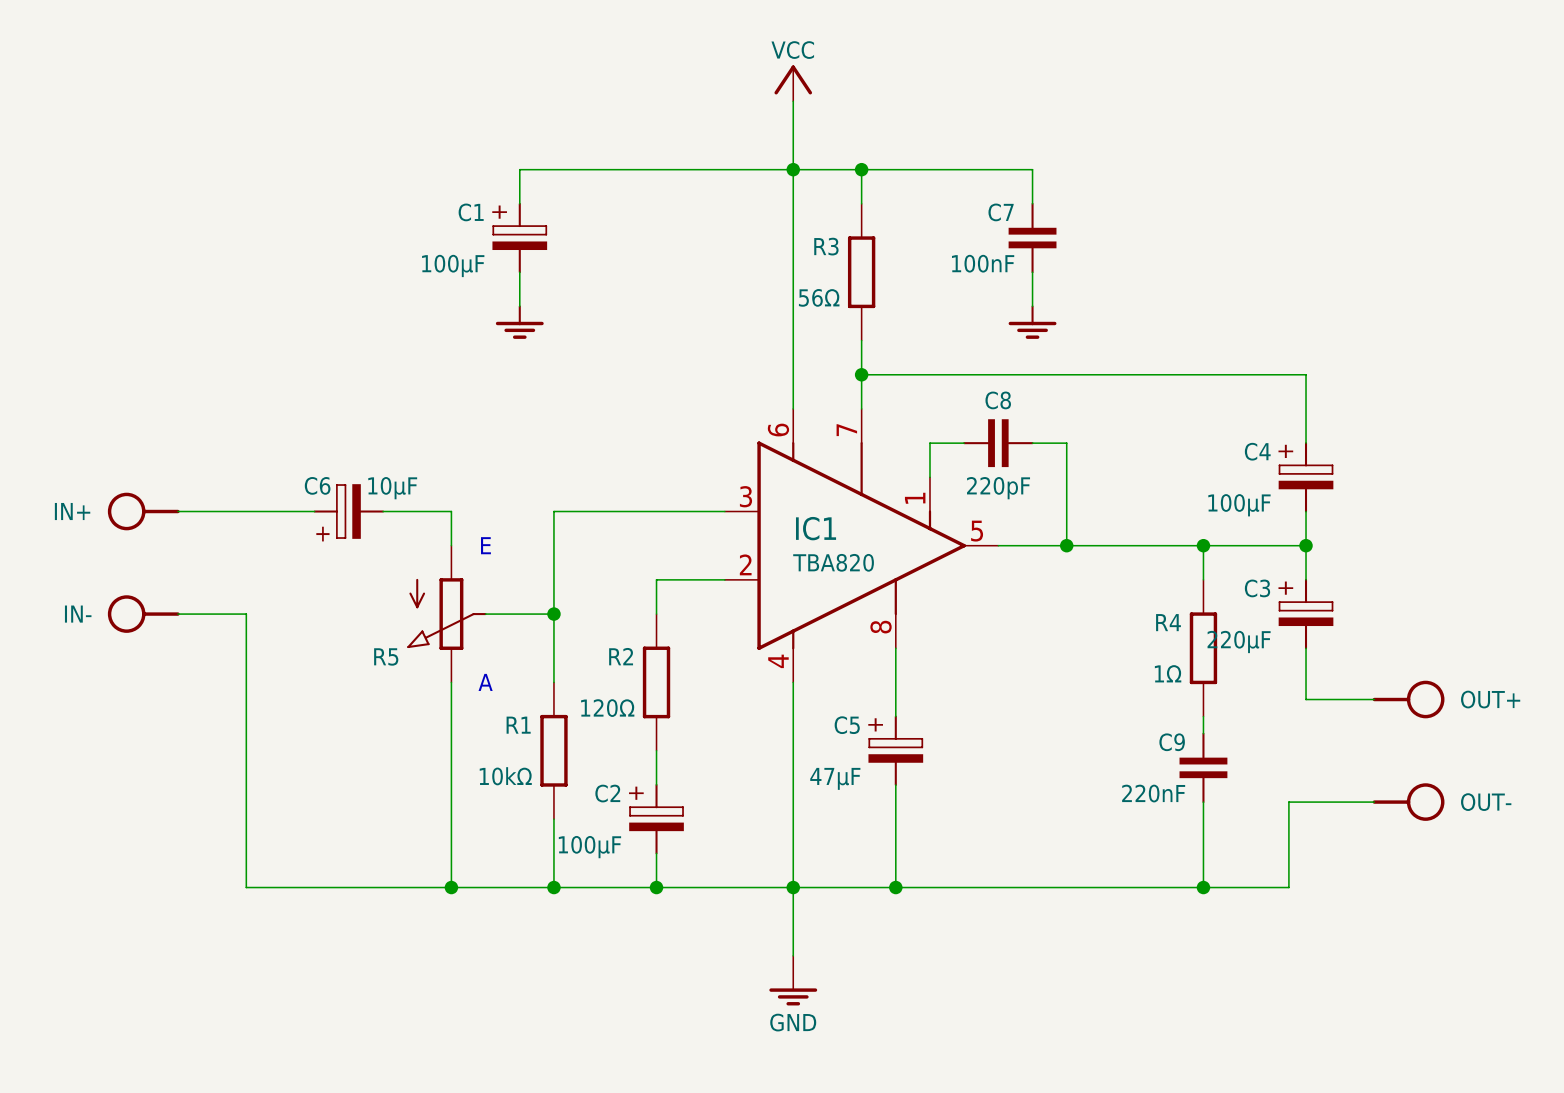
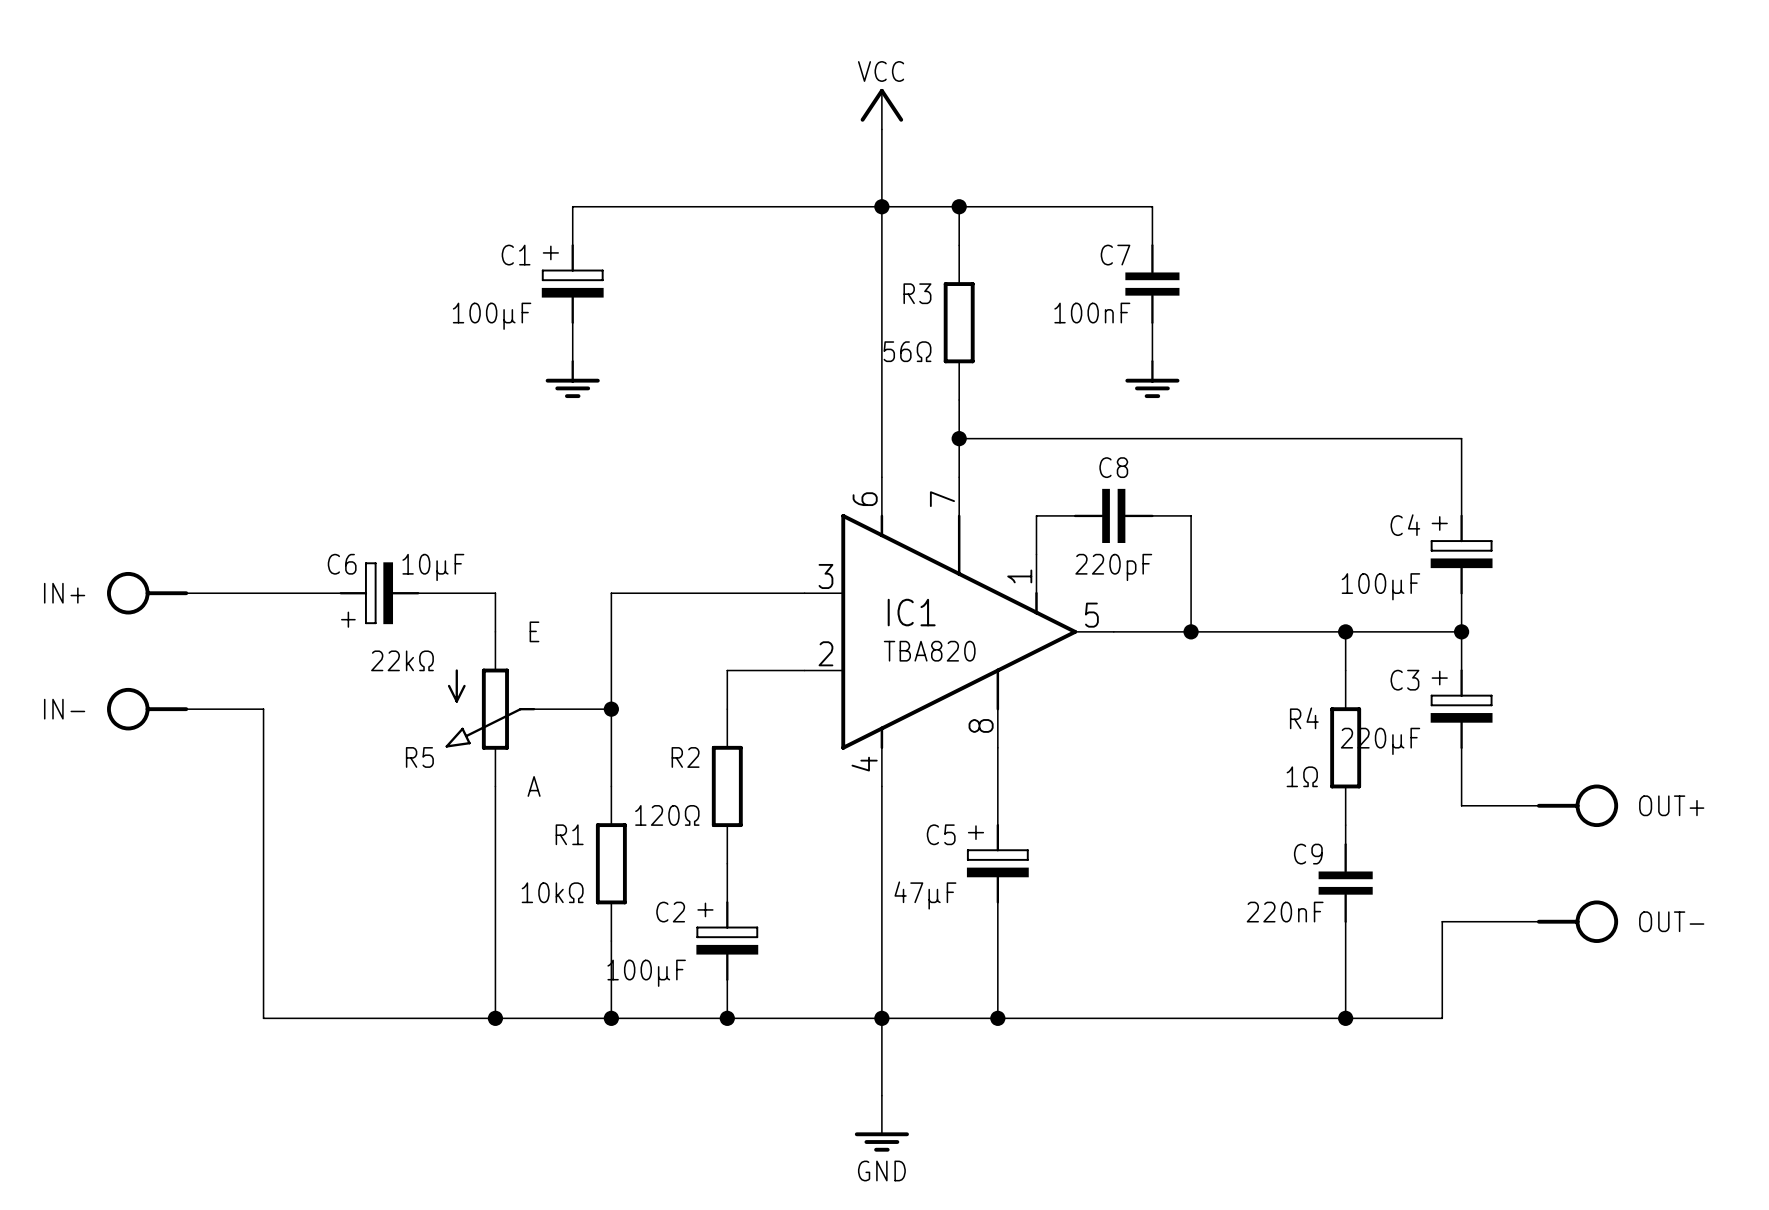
R5 value: none -> 22kΩ (402, 660)

